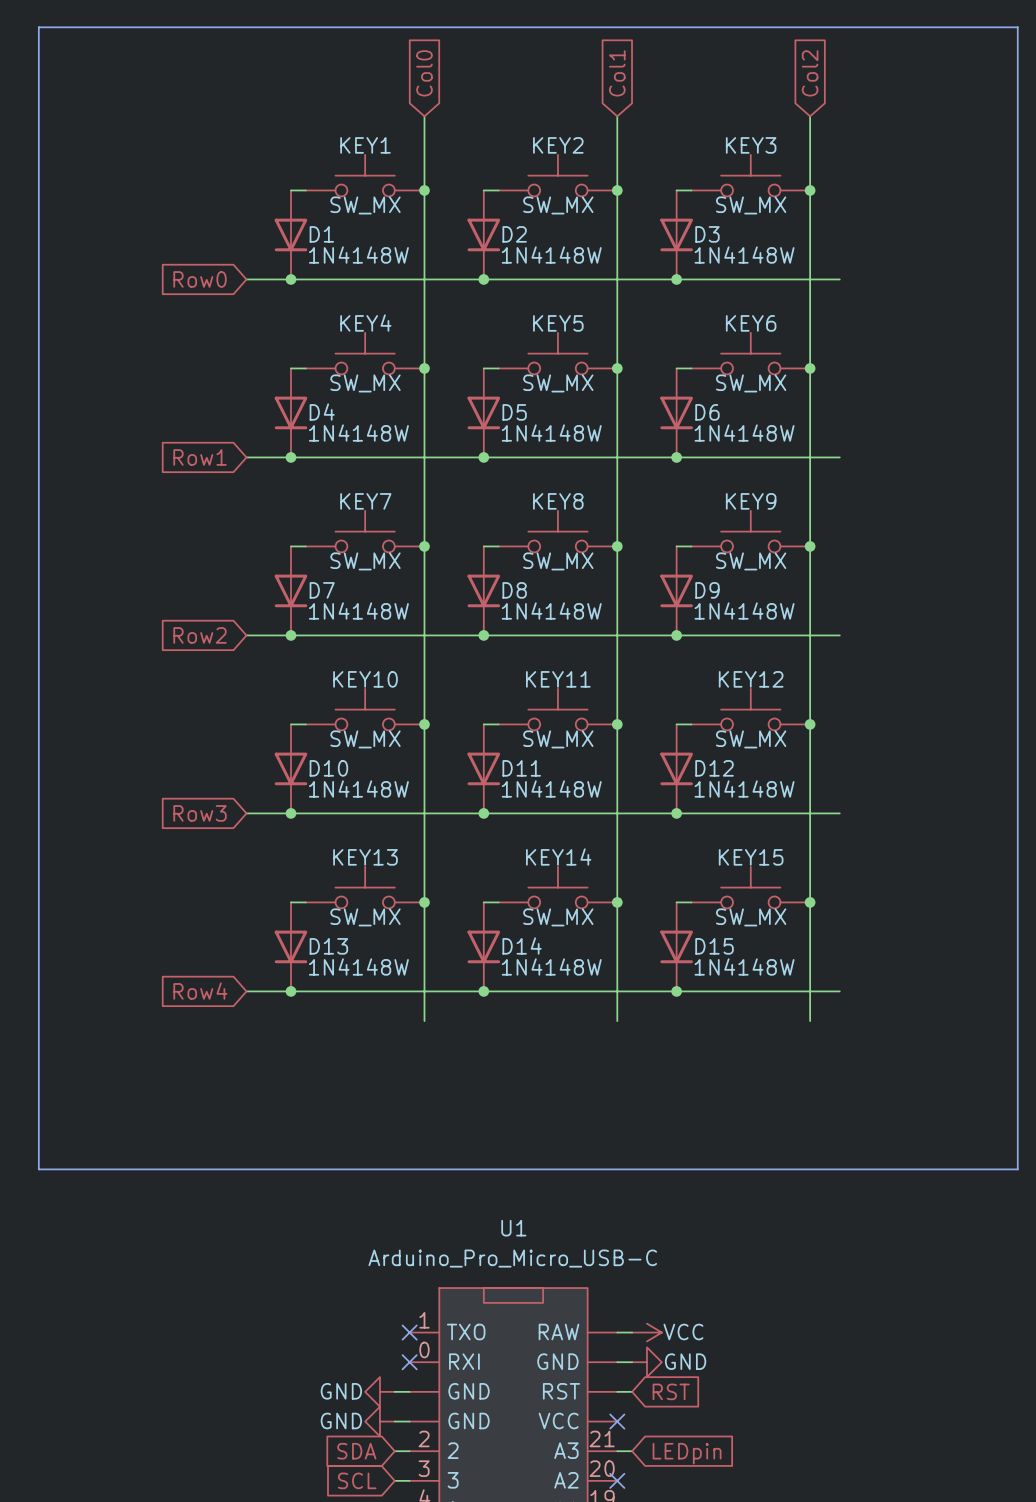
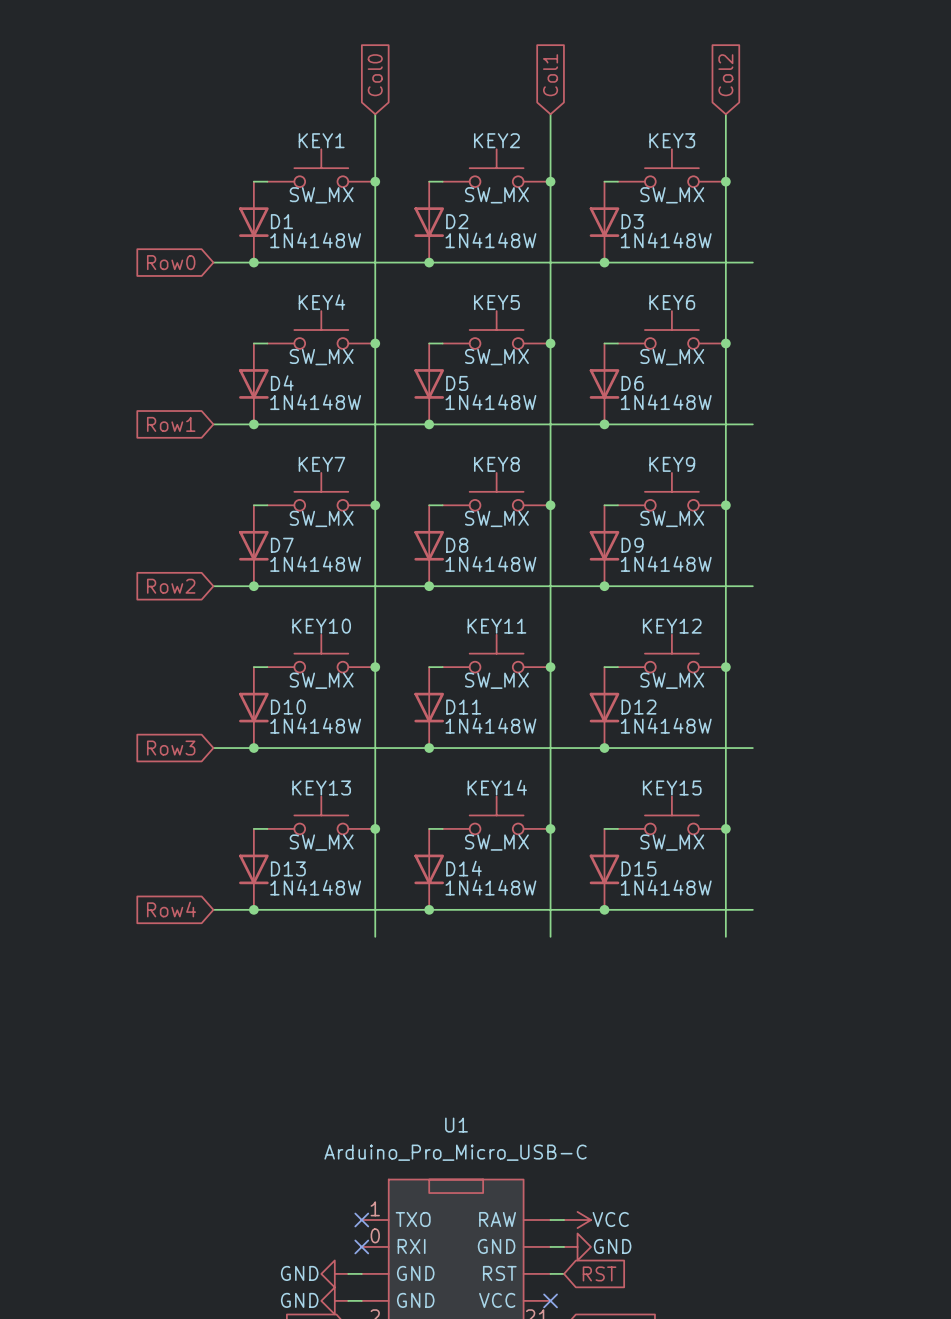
line: (38, 27) (1017, 27) (1017, 1169) (38, 1169) (38, 27) -> none

